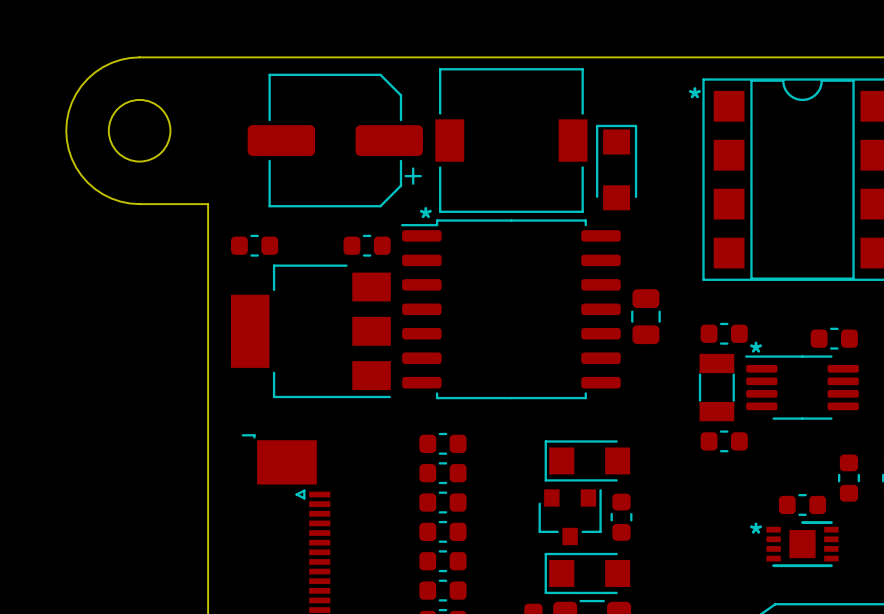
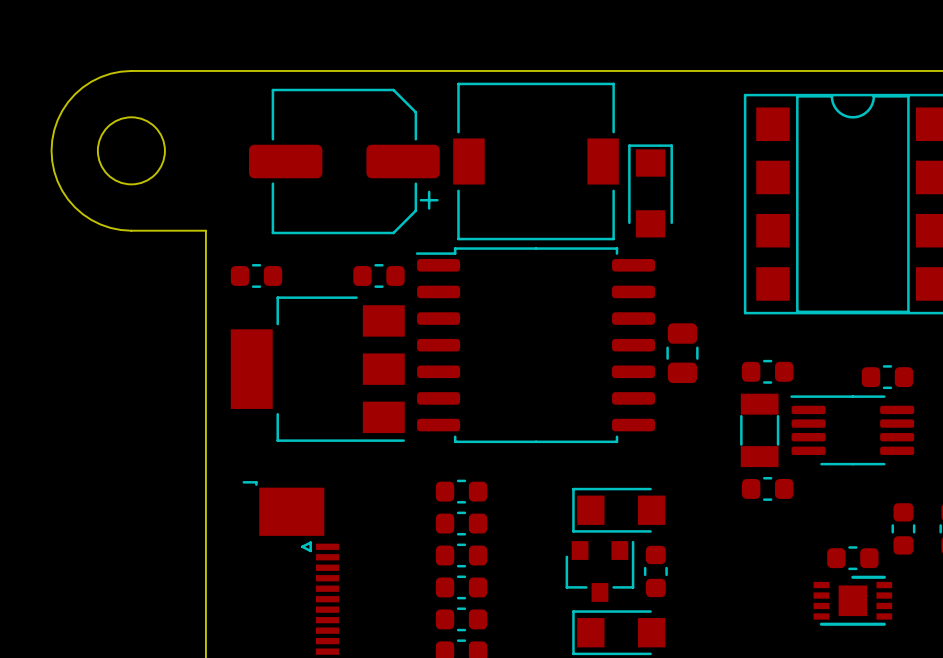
text: * (694, 92) -> none
text: * (425, 212) -> none
text: * (756, 347) -> none
text: * (756, 528) -> none

